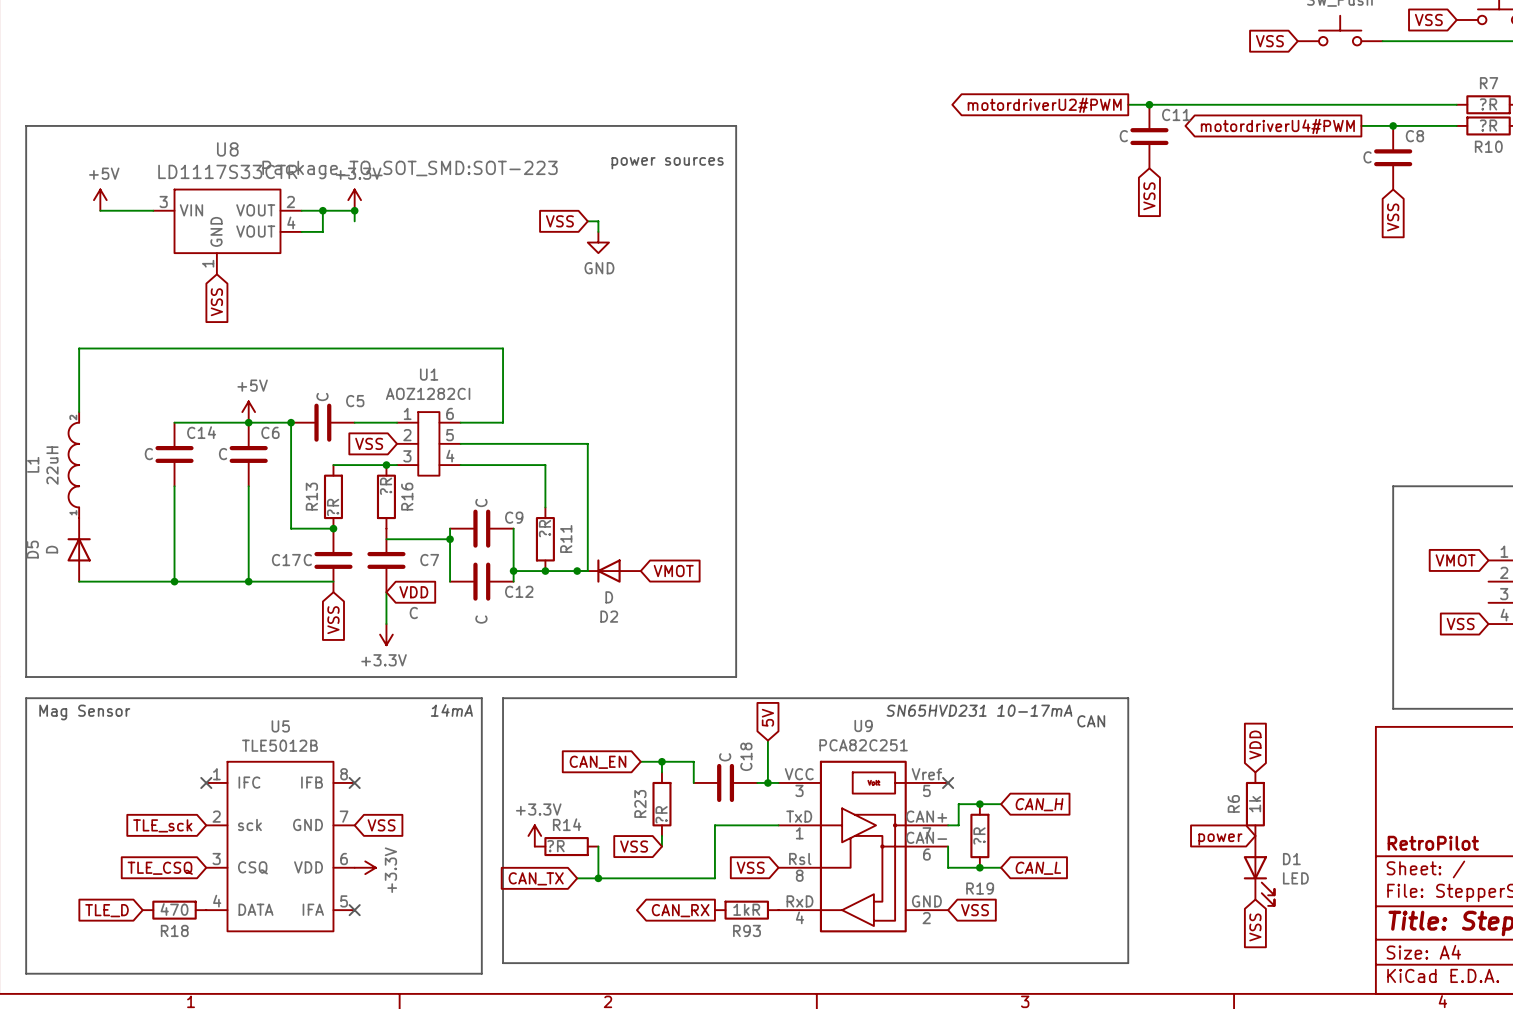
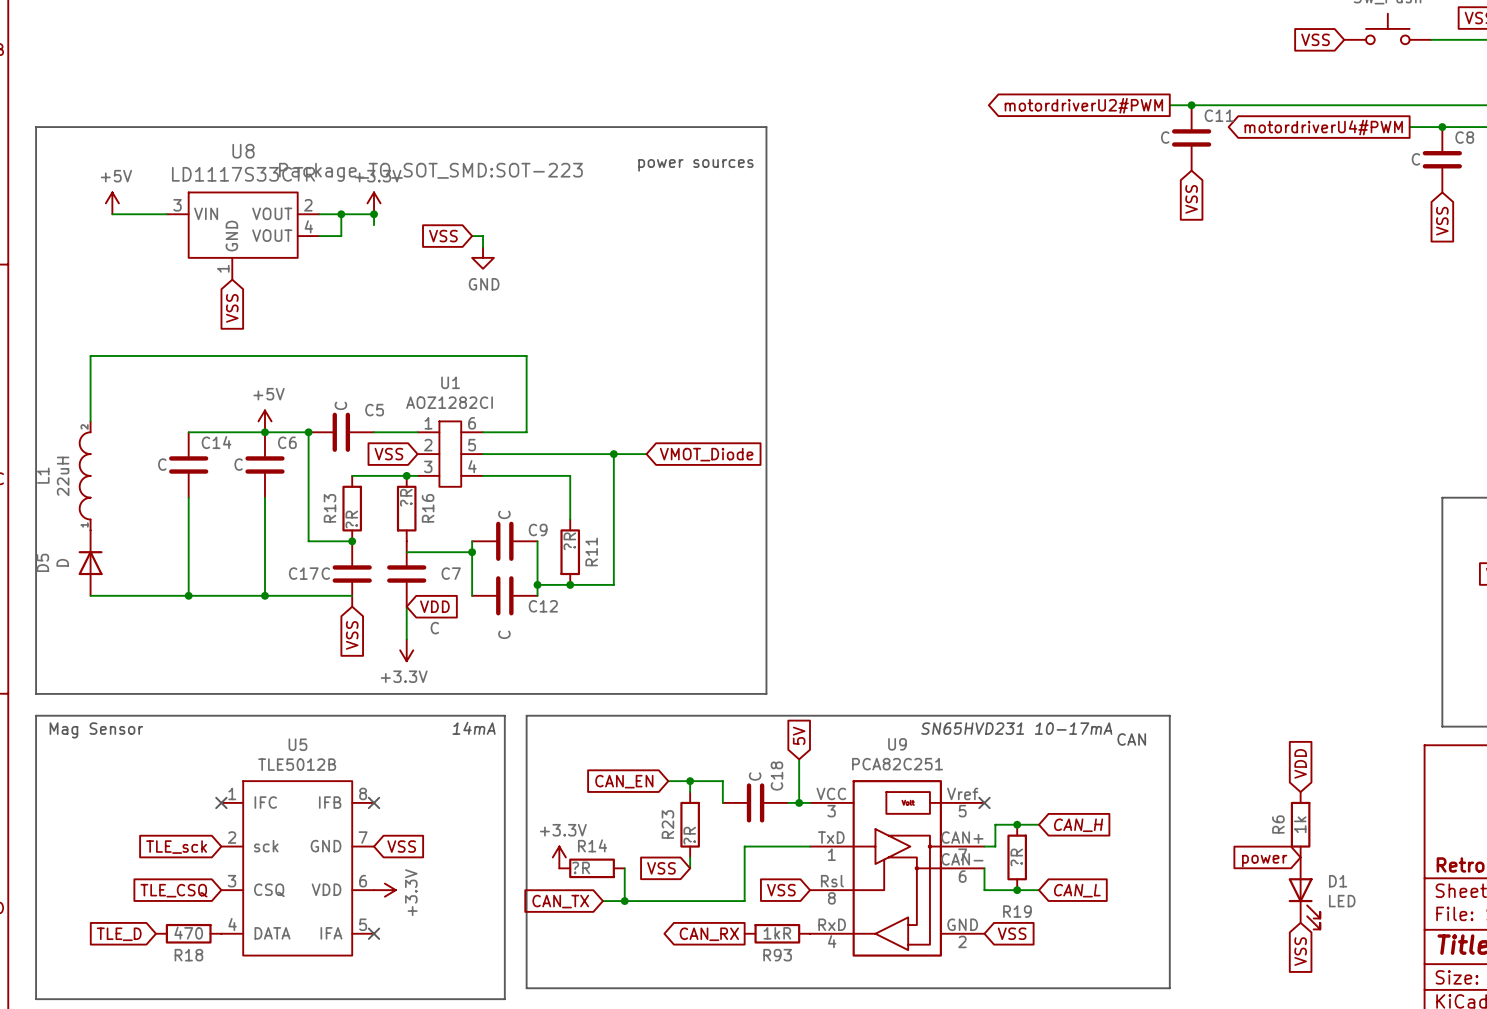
global label position: VSS (559, 221) -> VSS (443, 236)
wire: (587, 221) (598, 221) (598, 231) -> (472, 236) (483, 236) (483, 246)
power symbol position: GND (598, 242) -> GND (483, 257)
wire: none -> (613, 454) (646, 454)
junction: none -> (613, 454)
global label: none -> VMOT_Diode (706, 454)
junction: (577, 571) -> none
D2: D (608, 571) -> none
global label: VMOT (673, 571) -> none

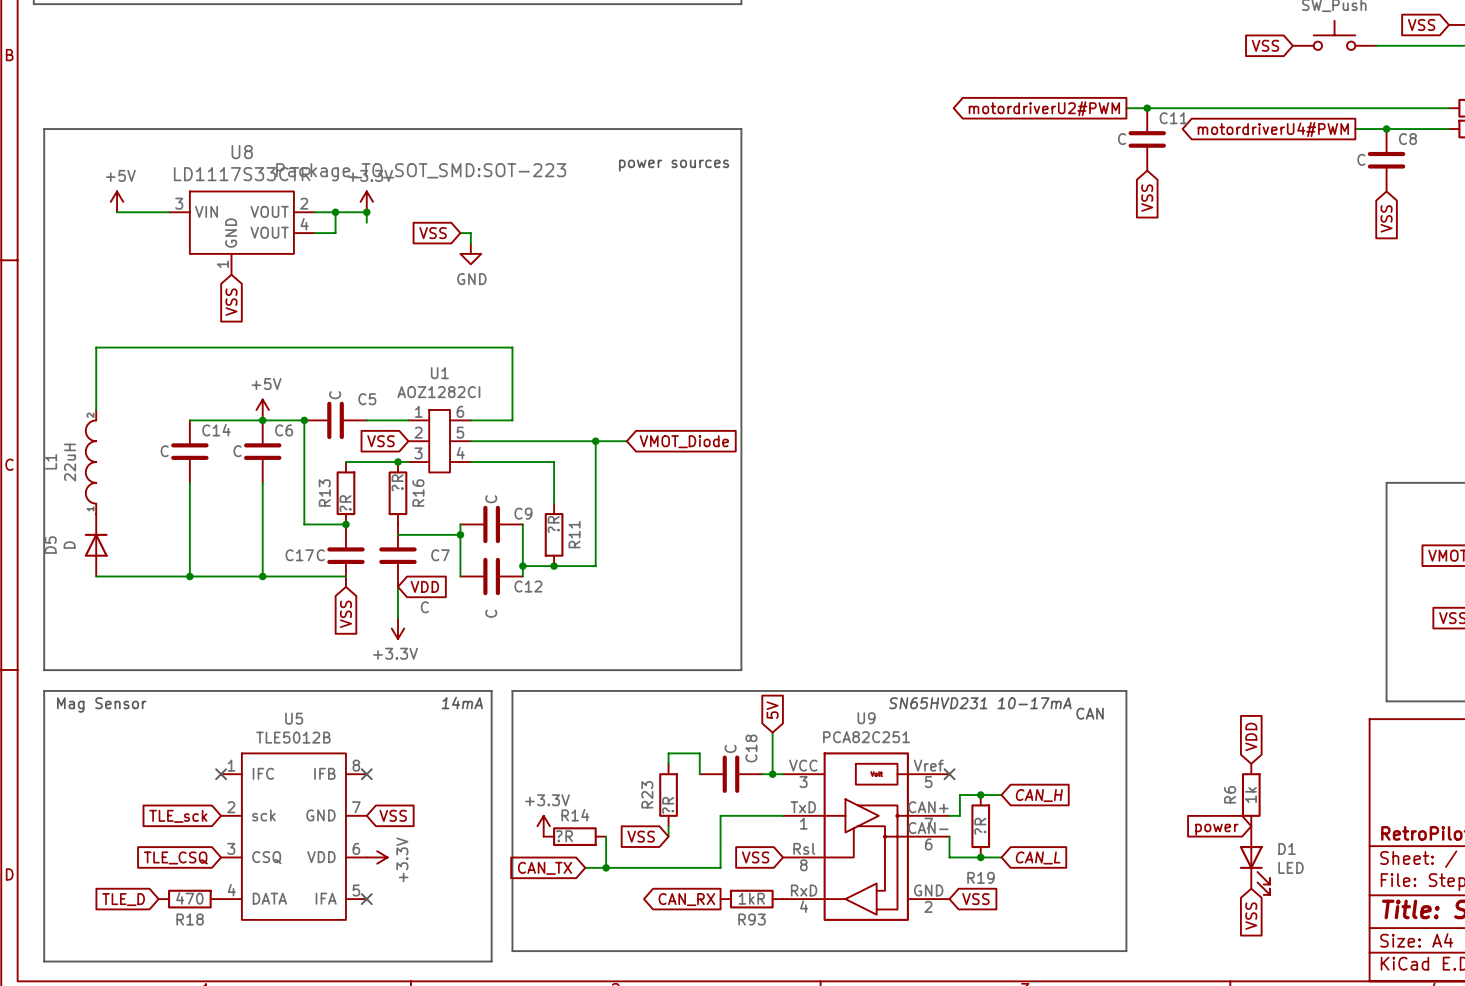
global label: CAN_EN (624, 781) -> none
wire: (668, 781) (690, 781) -> none
junction: (690, 781) -> none

